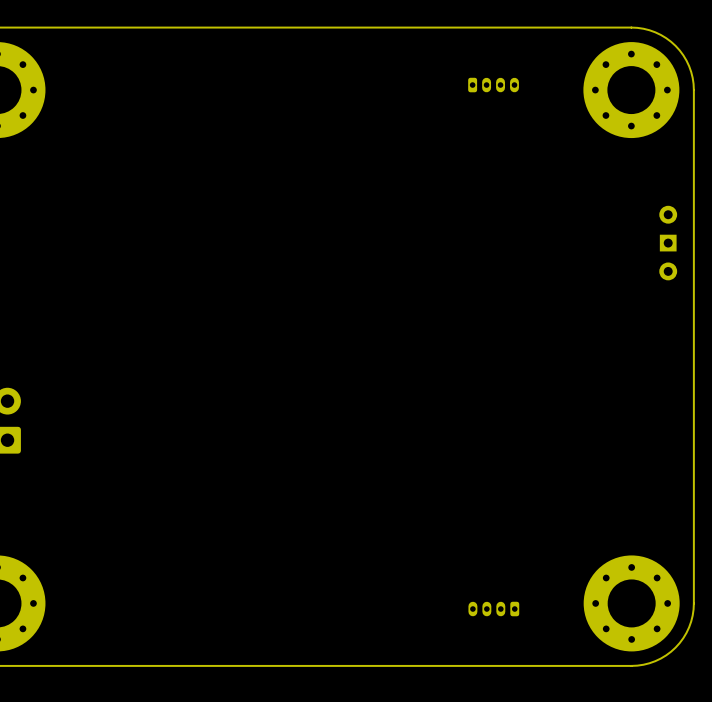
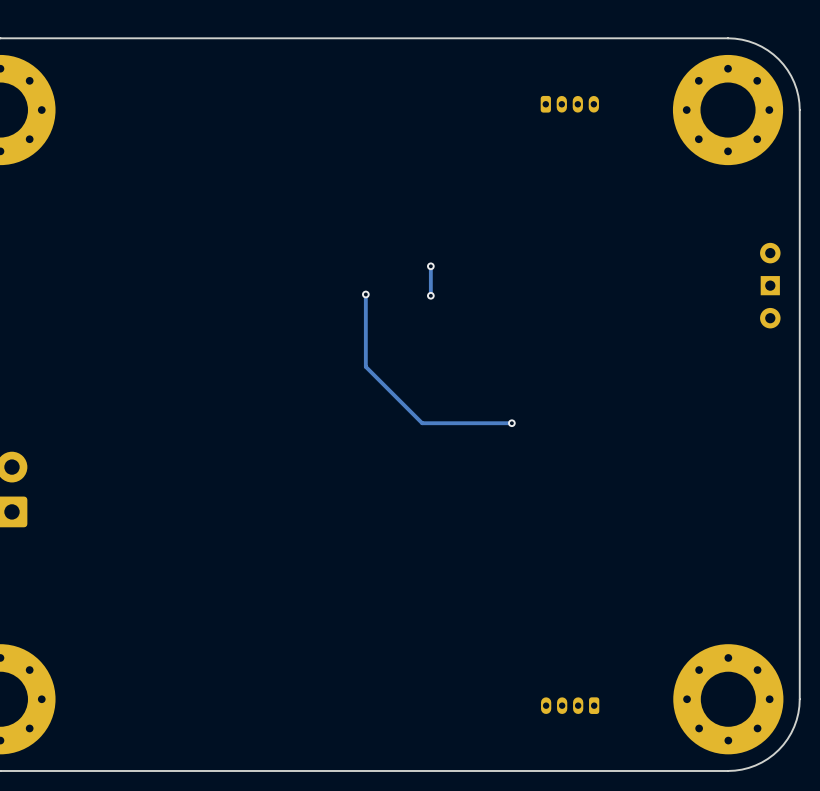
track: none -> (430, 266) (430, 295)
via: none -> (430, 266)
track: none -> (365, 294) (365, 366) (422, 423) (511, 423)
via: none -> (365, 294)
via: none -> (430, 295)
via: none -> (511, 423)

